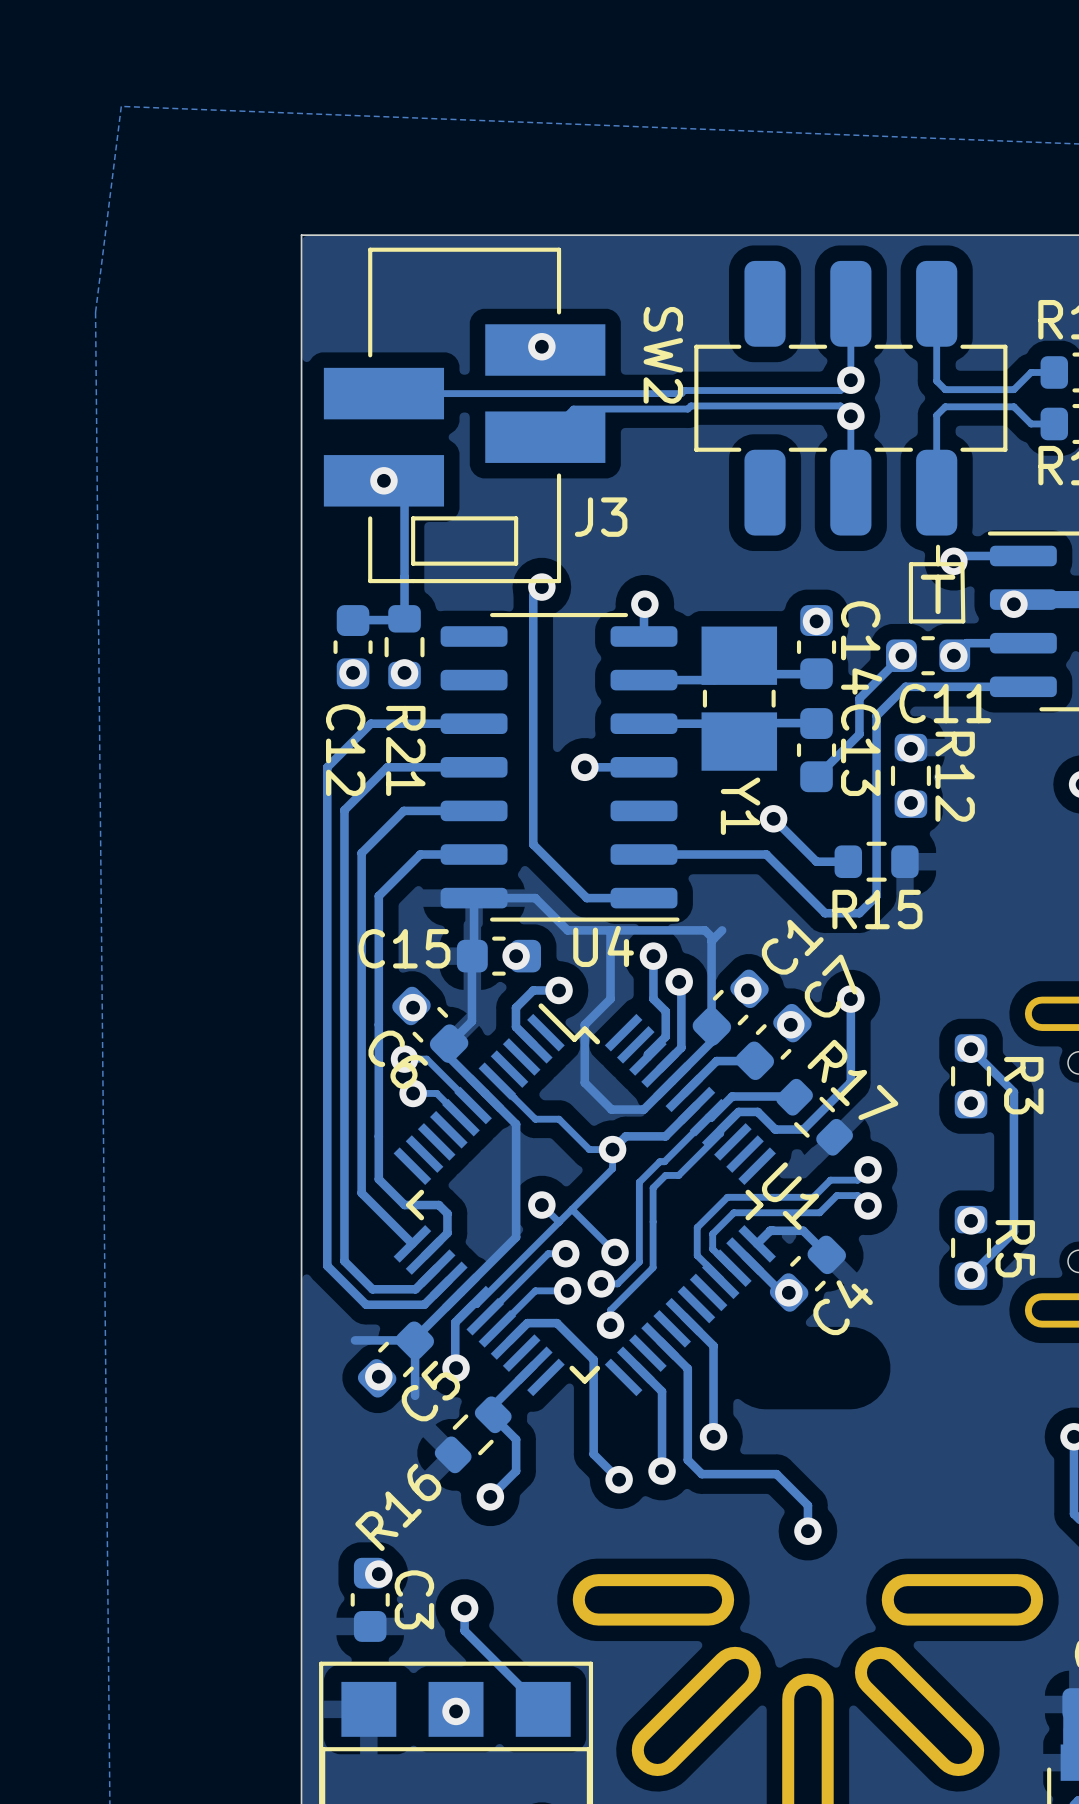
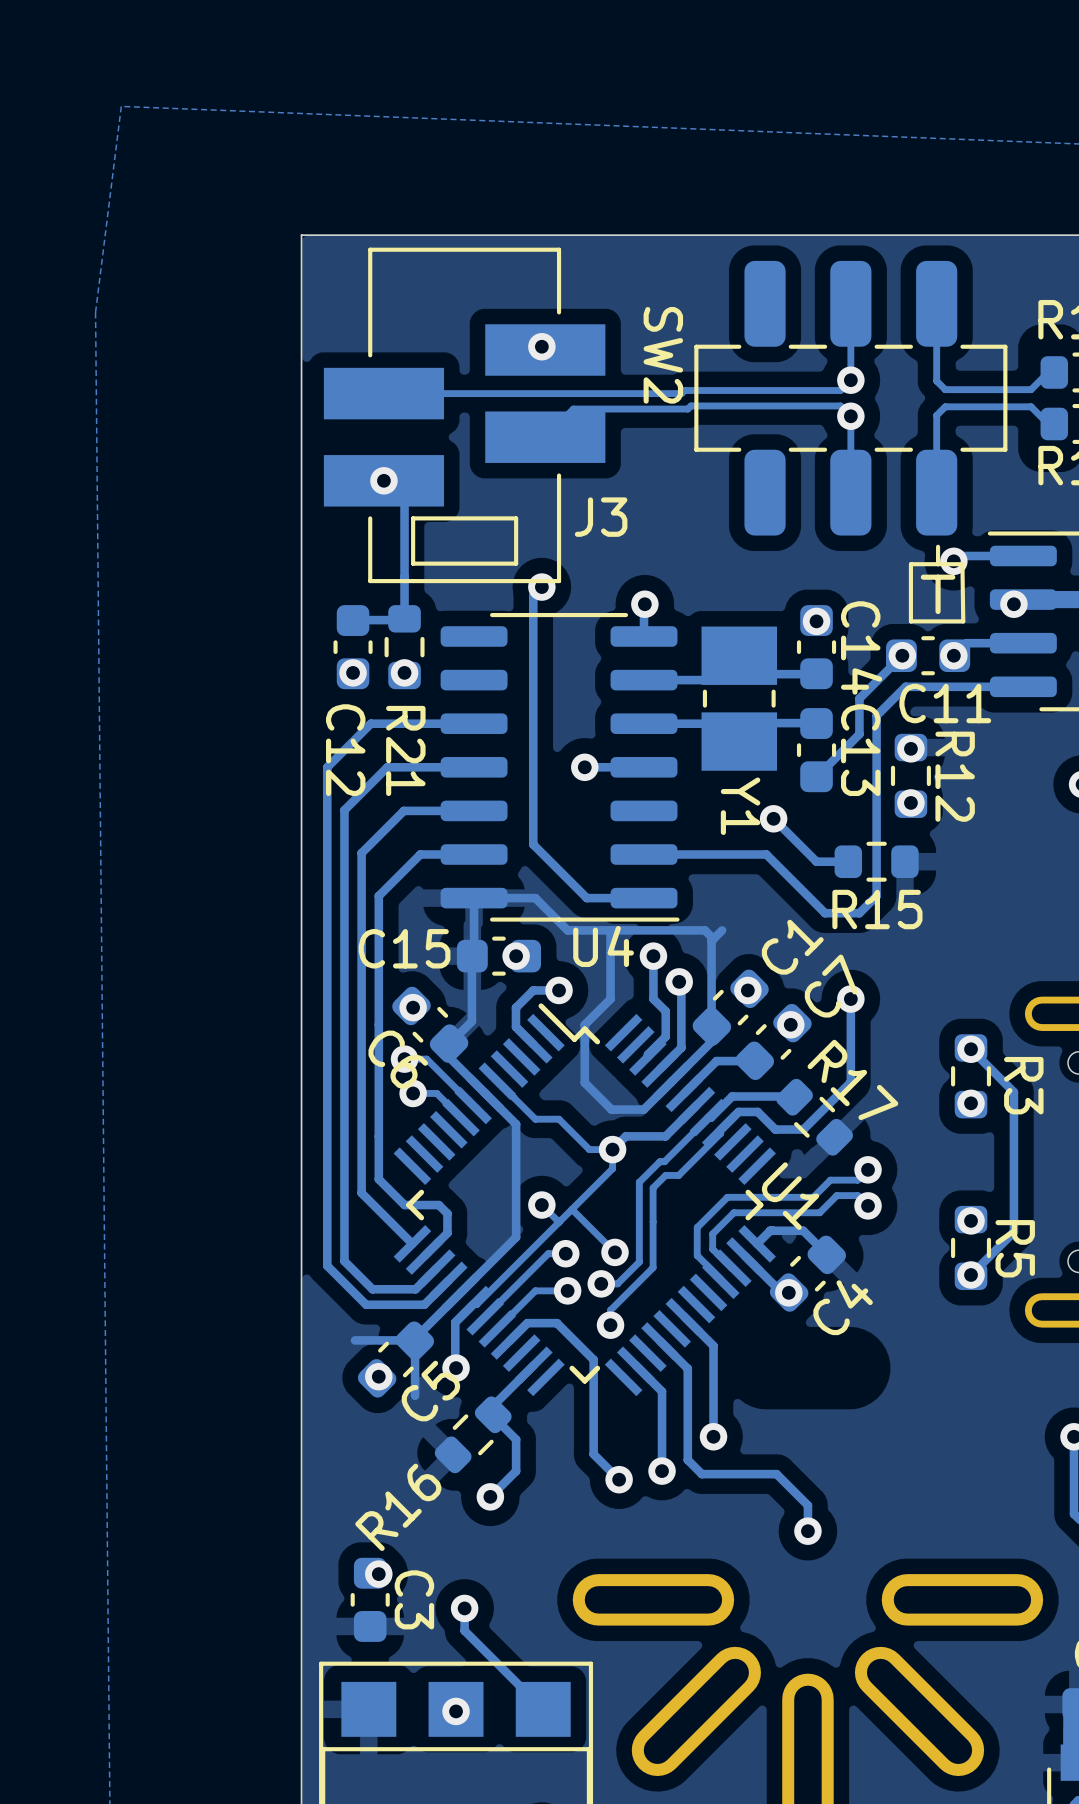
track: (1055, 372) (1031, 372) (1013, 389) -> (1051, 363) (1051, 369) (1031, 389) (1013, 389)
track: (1013, 406) (1031, 423) (1055, 423) -> (1013, 406) (1031, 406) (1051, 426) (1051, 432)

